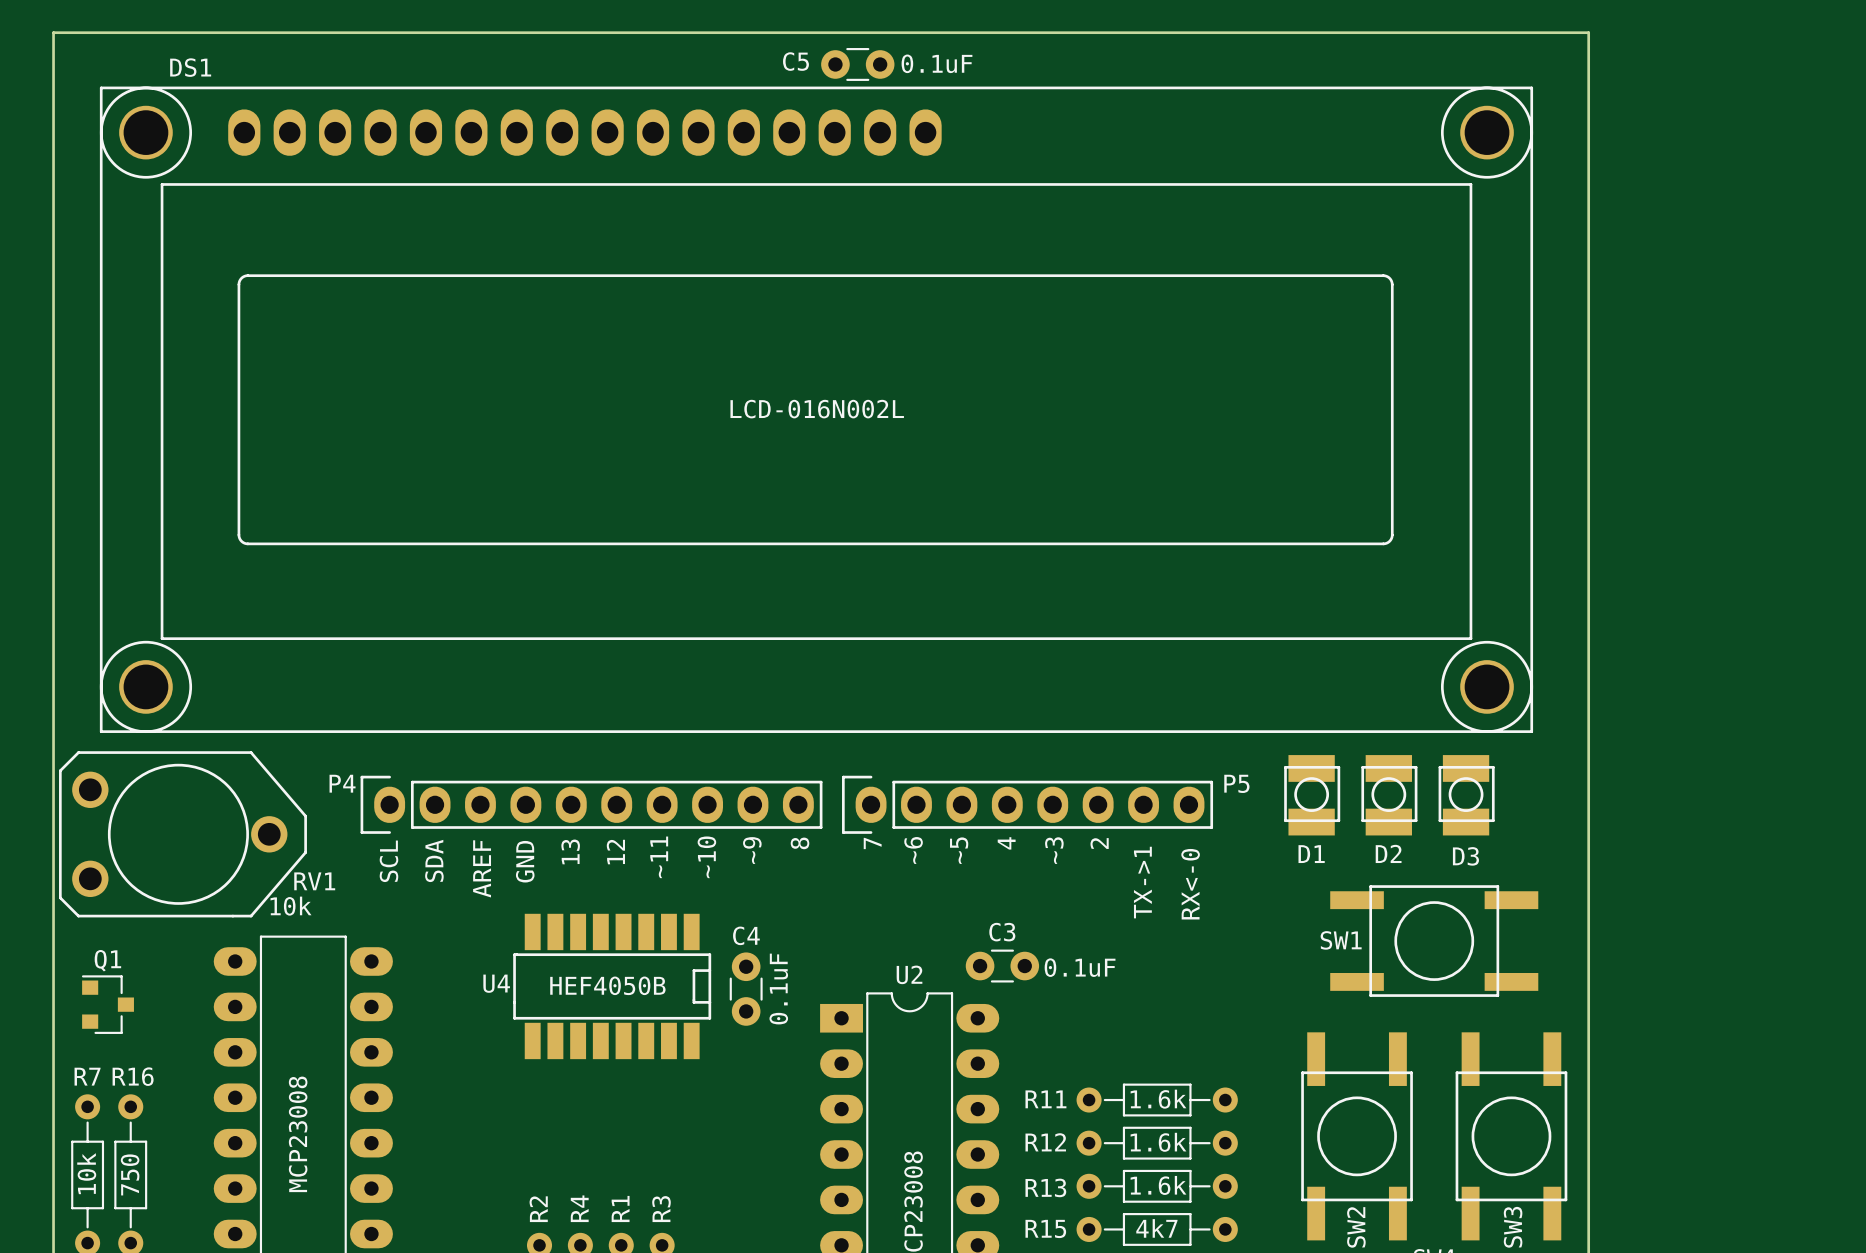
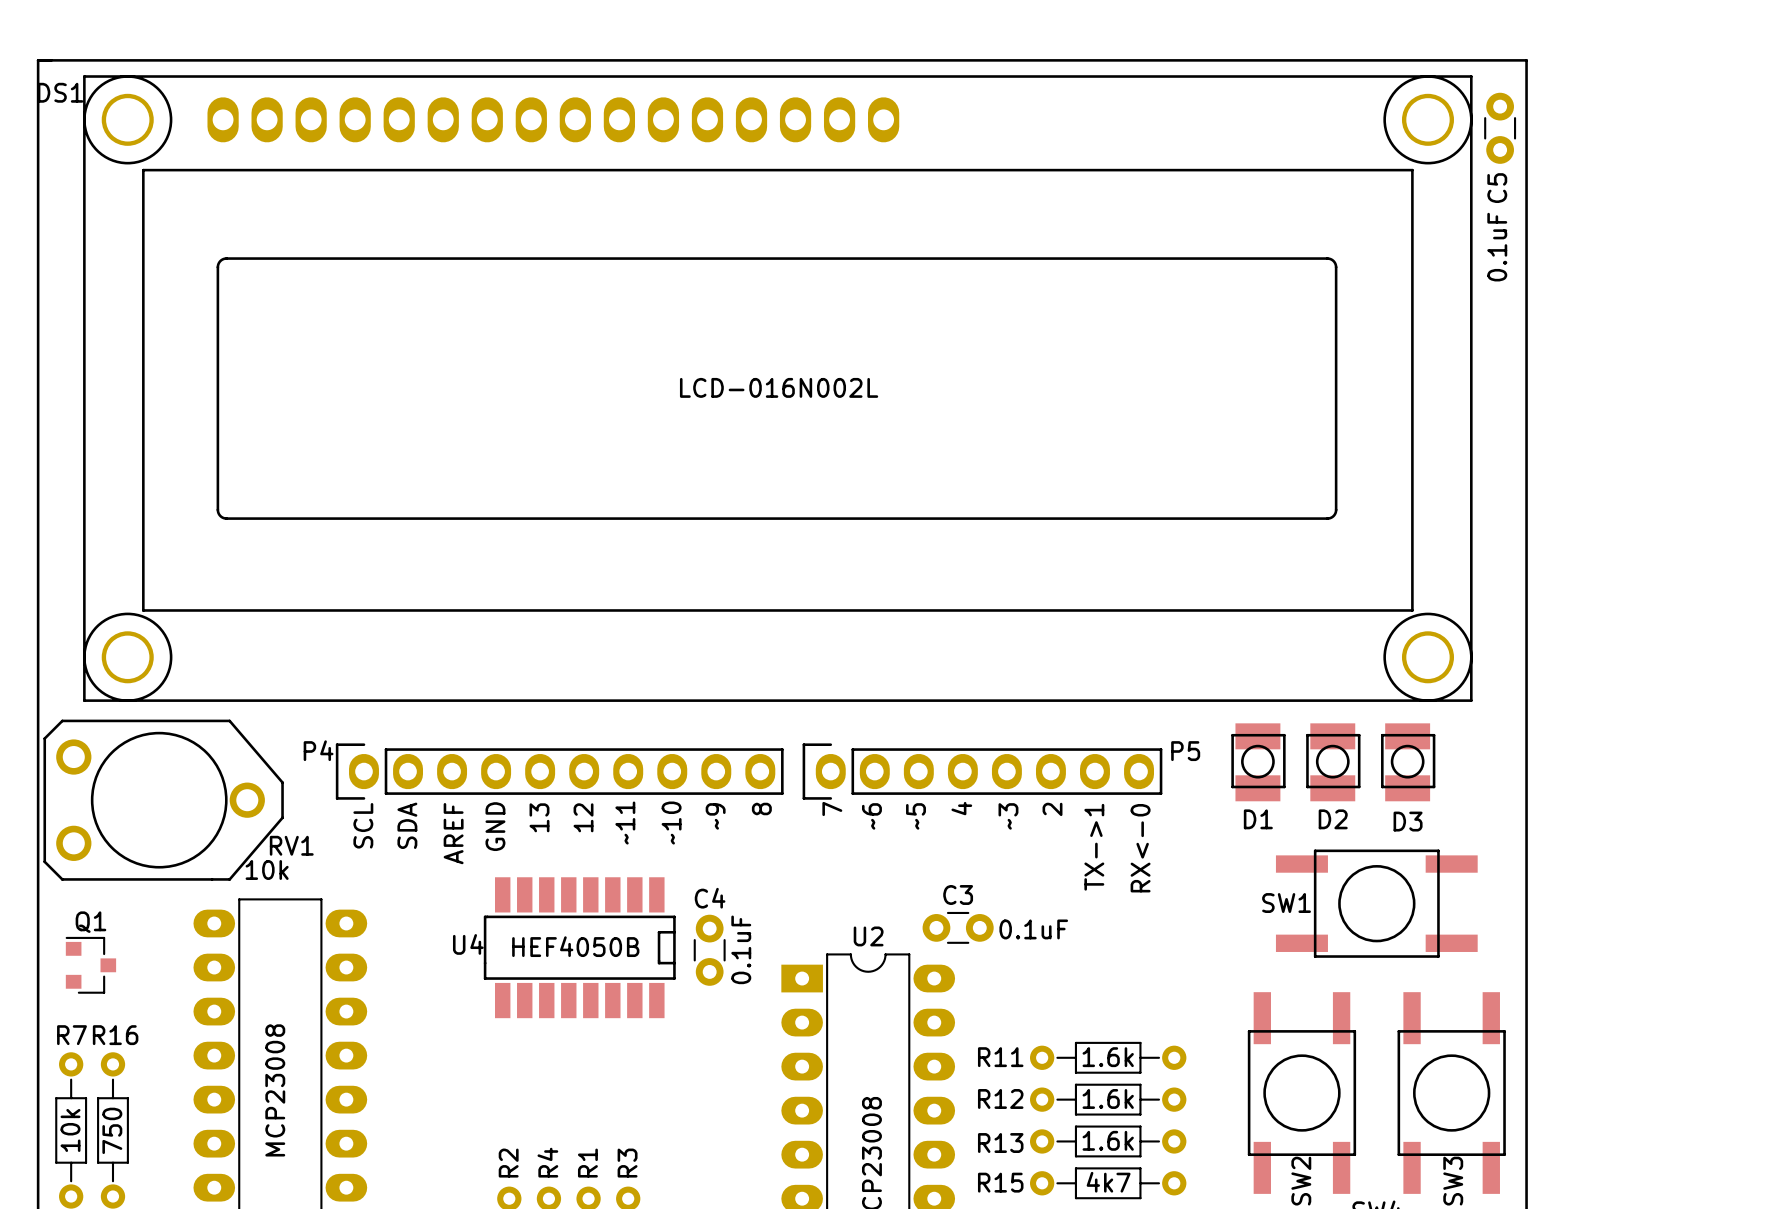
C5 name position: C5 (795, 61) -> C5 (1497, 188)
C5 value position: 0.1uF (936, 63) -> 0.1uF (1497, 247)
C5 rotation: 0° (857, 64) -> 90° clockwise (1500, 128)
C5 position: (857, 64) -> (1500, 128)
DS1 name position: DS1 (190, 67) -> DS1 (60, 92)
board edge: (53, 71) (53, 32) (1588, 32) (1588, 71) -> (38, 60) (1526, 60)

